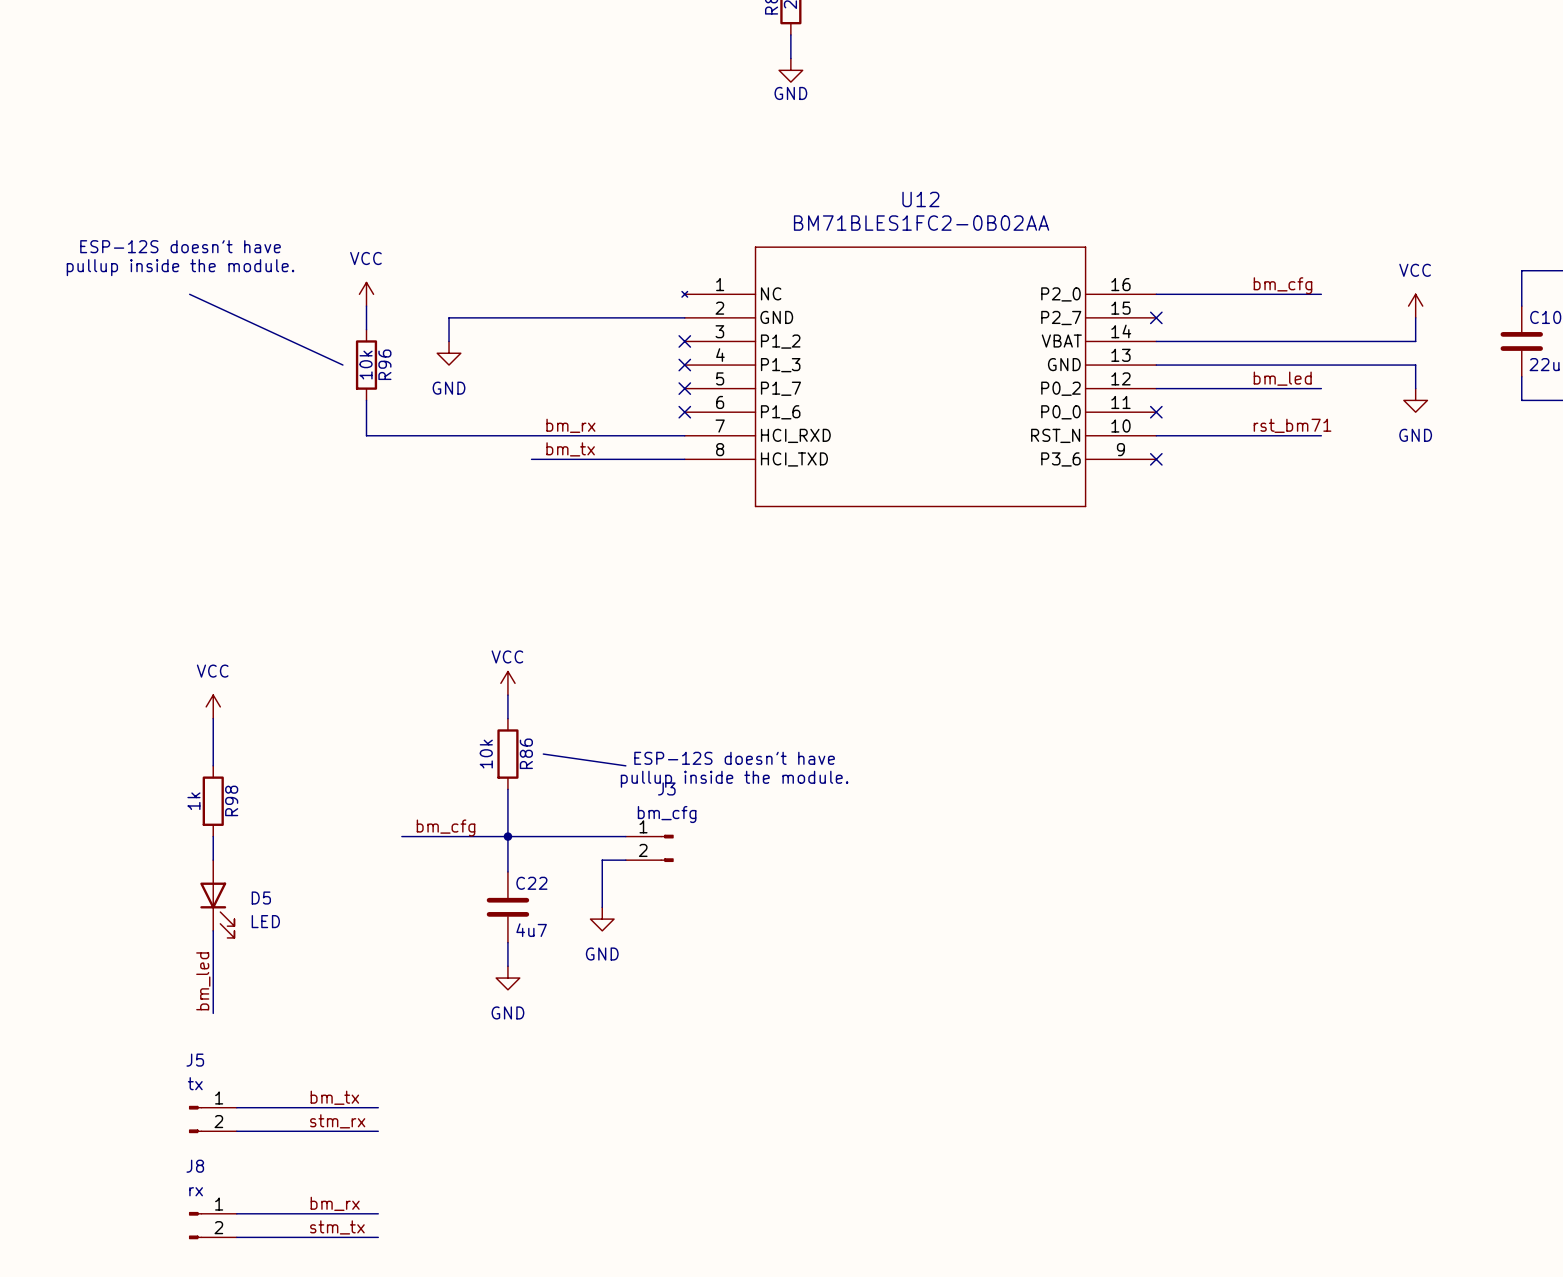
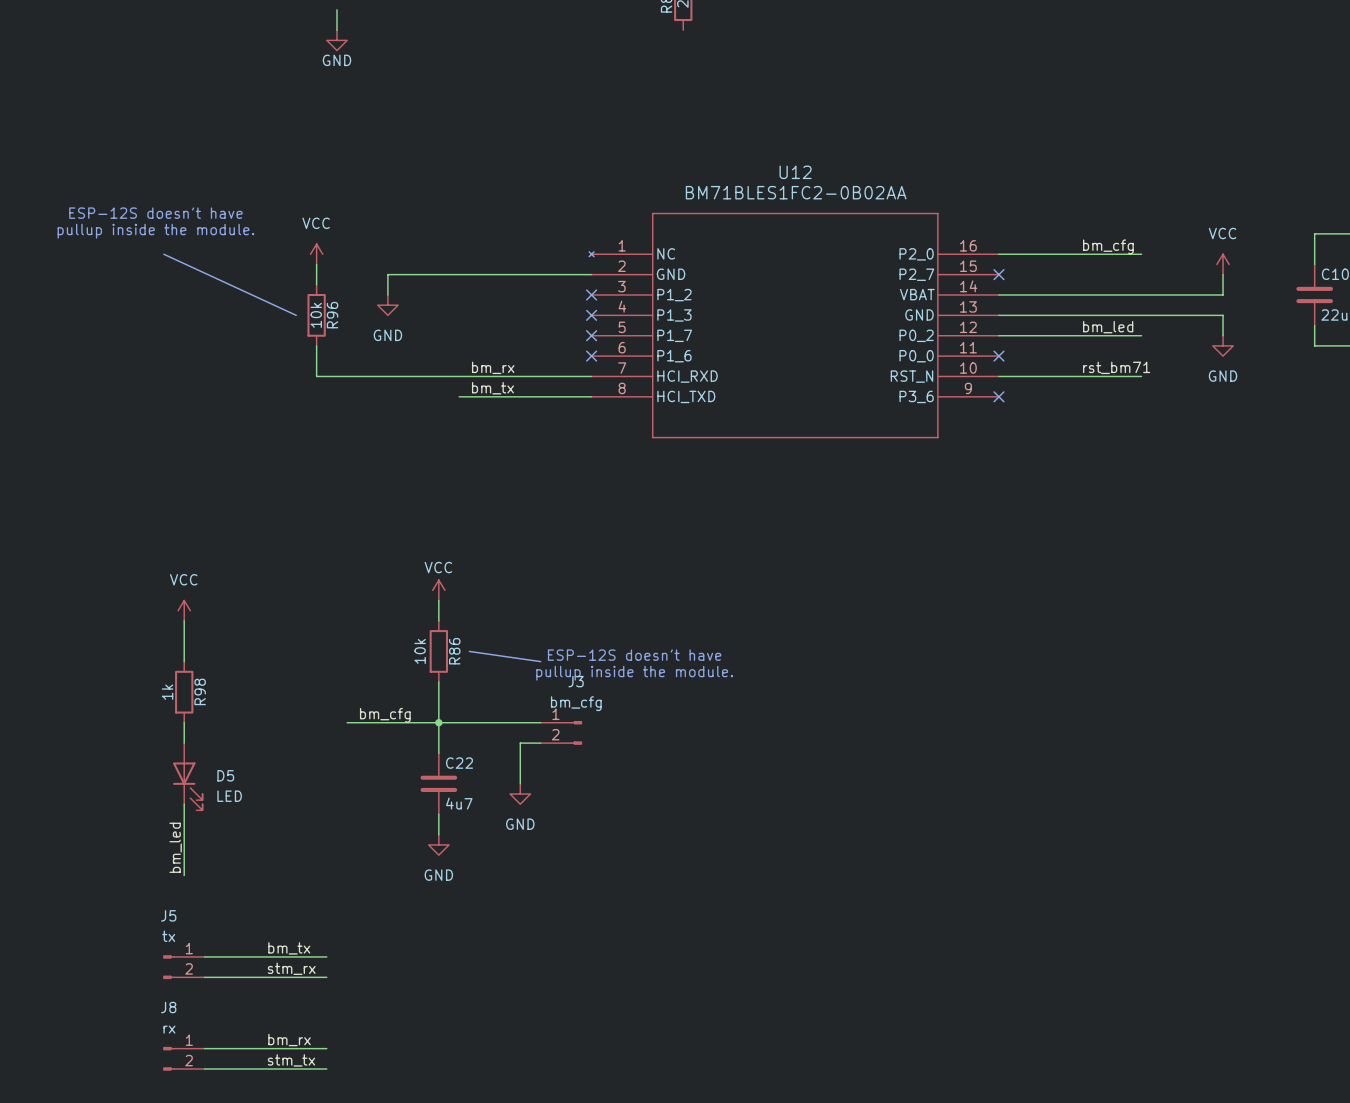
wire: none -> (336, 9) (336, 30)
wire: (790, 34) (790, 58) -> none
power symbol: none -> GND (336, 40)
power symbol: GND (790, 70) -> none

